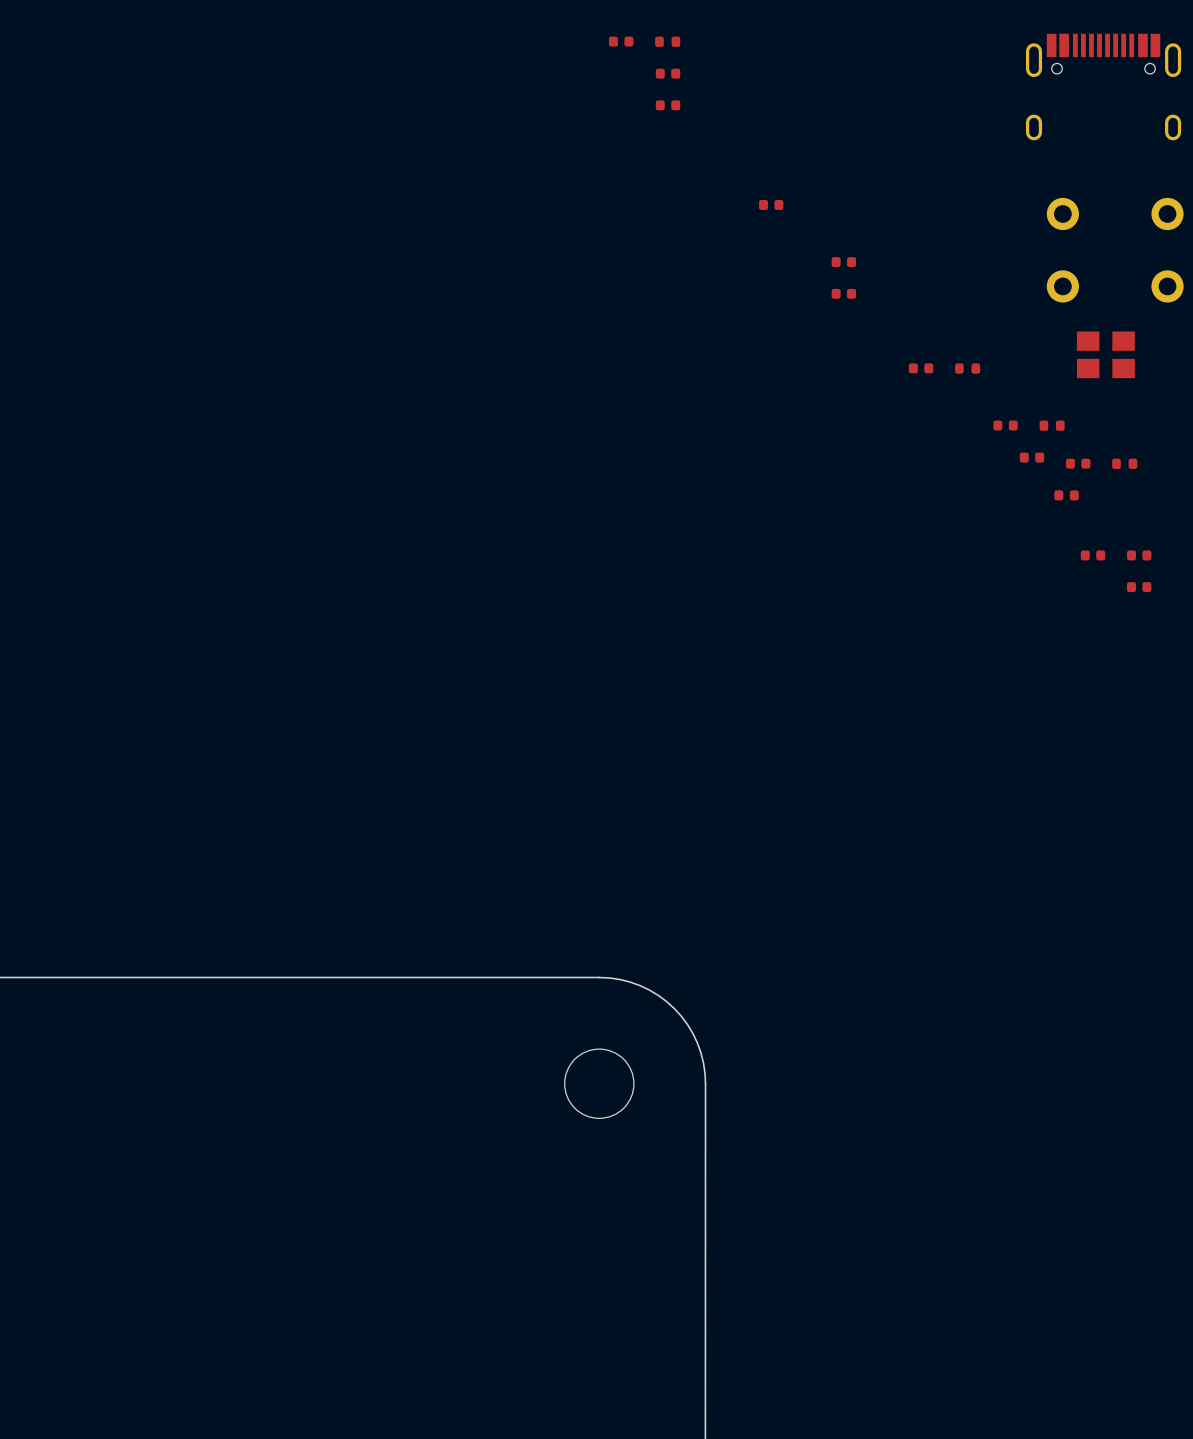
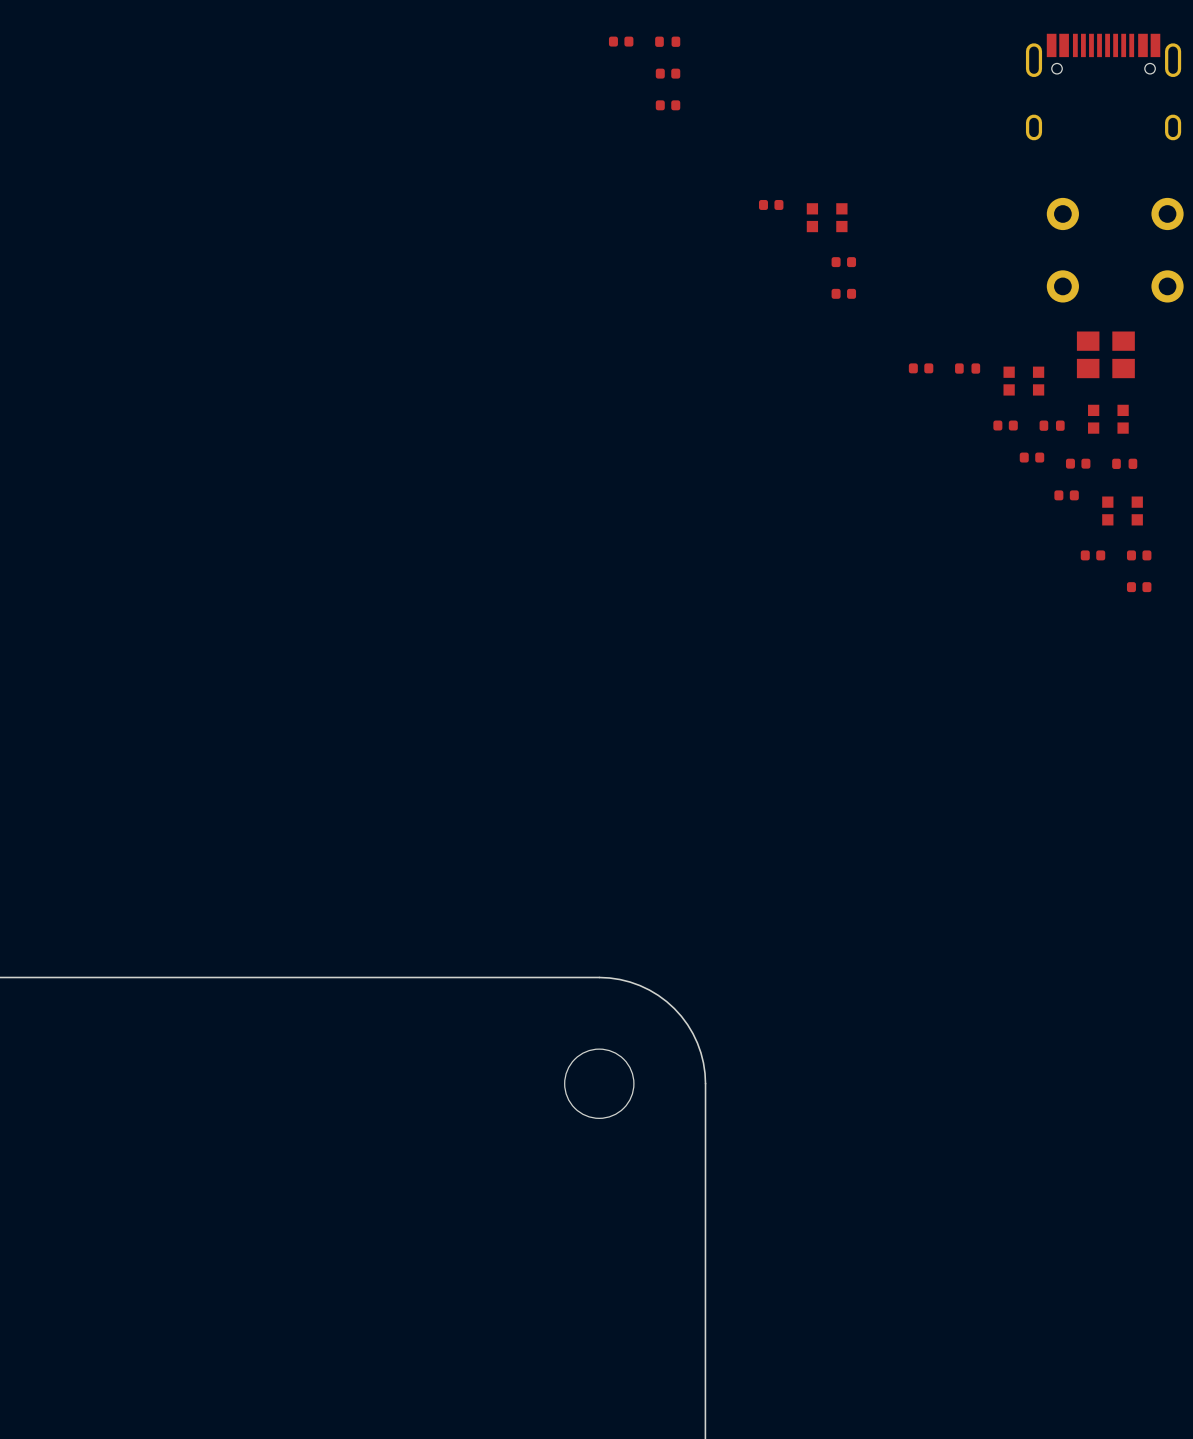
part: none -> (827, 217)
part: none -> (1023, 381)
part: none -> (1108, 419)
part: none -> (1122, 510)

